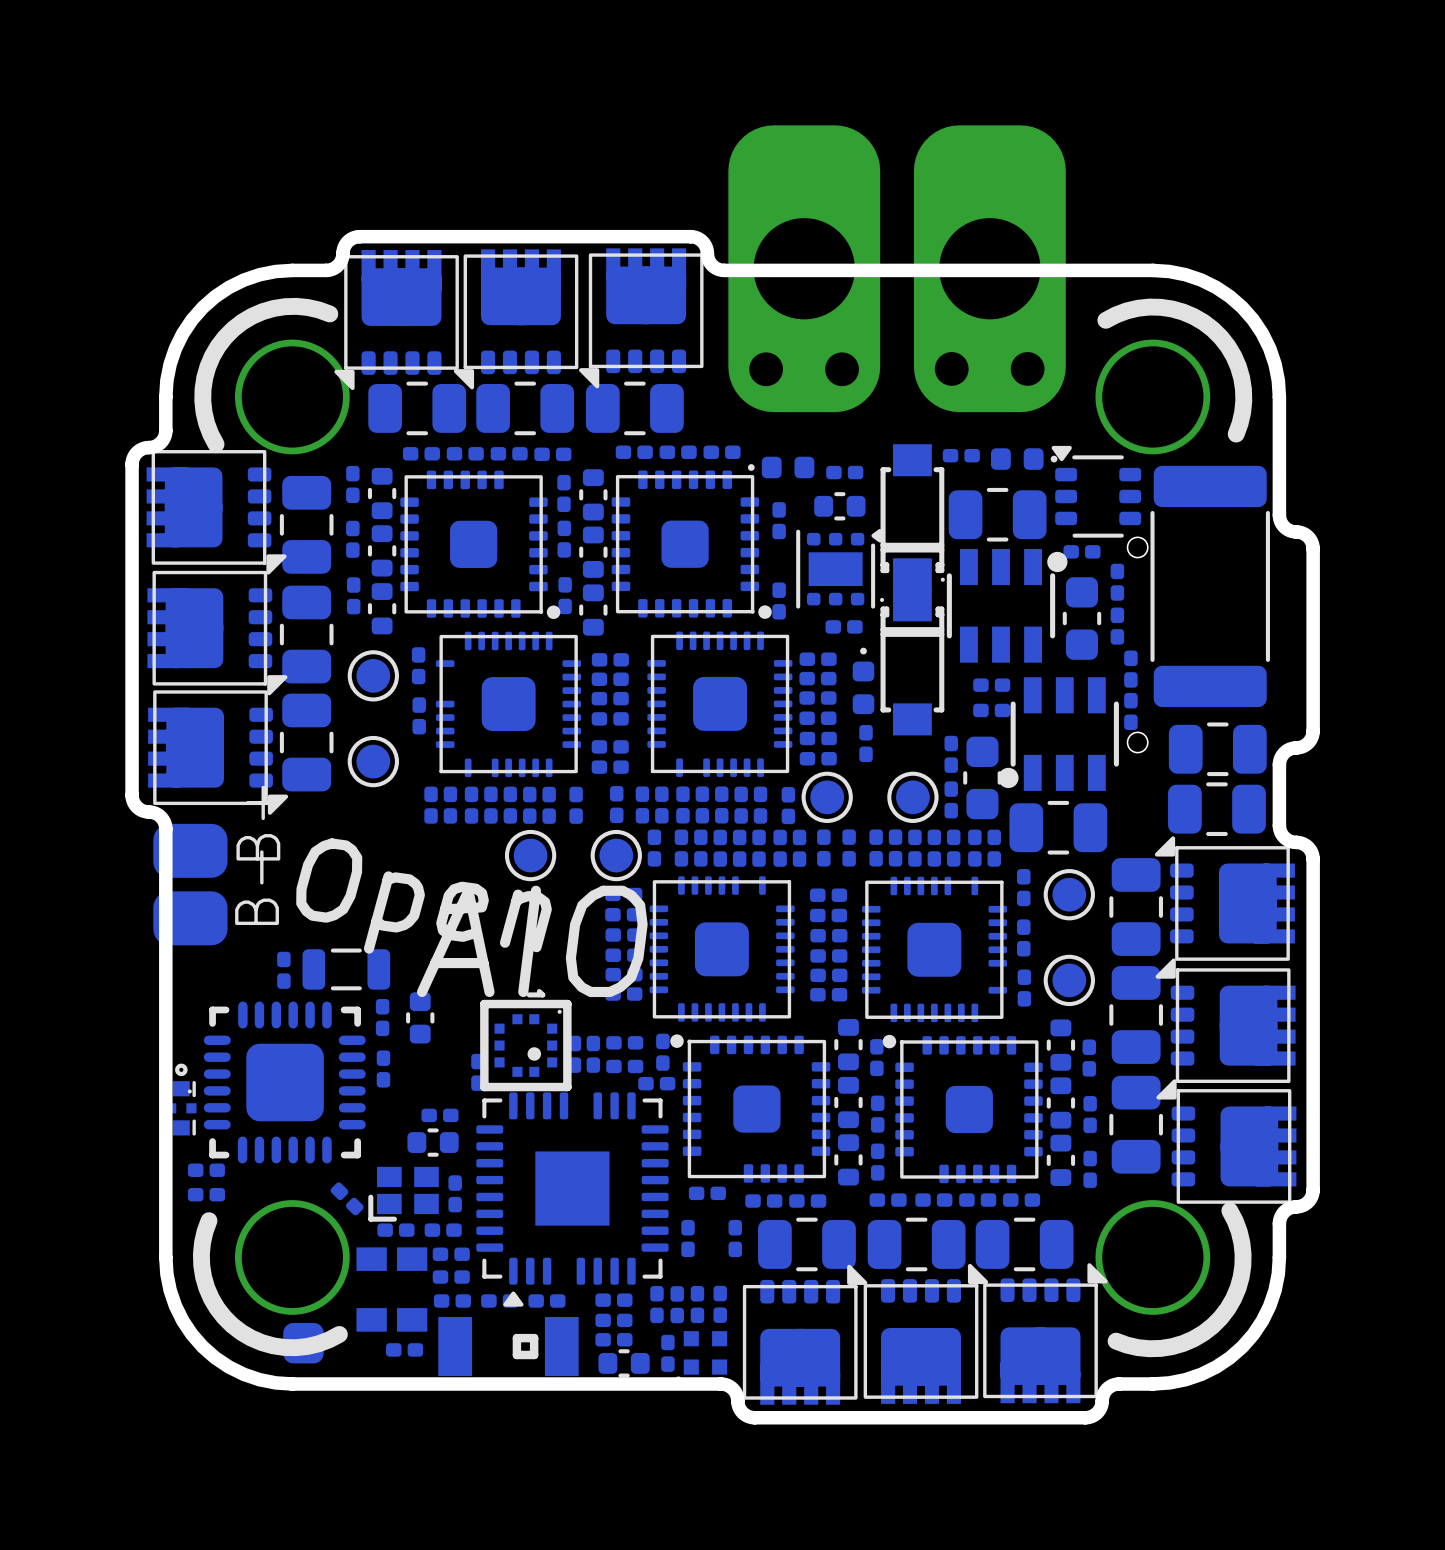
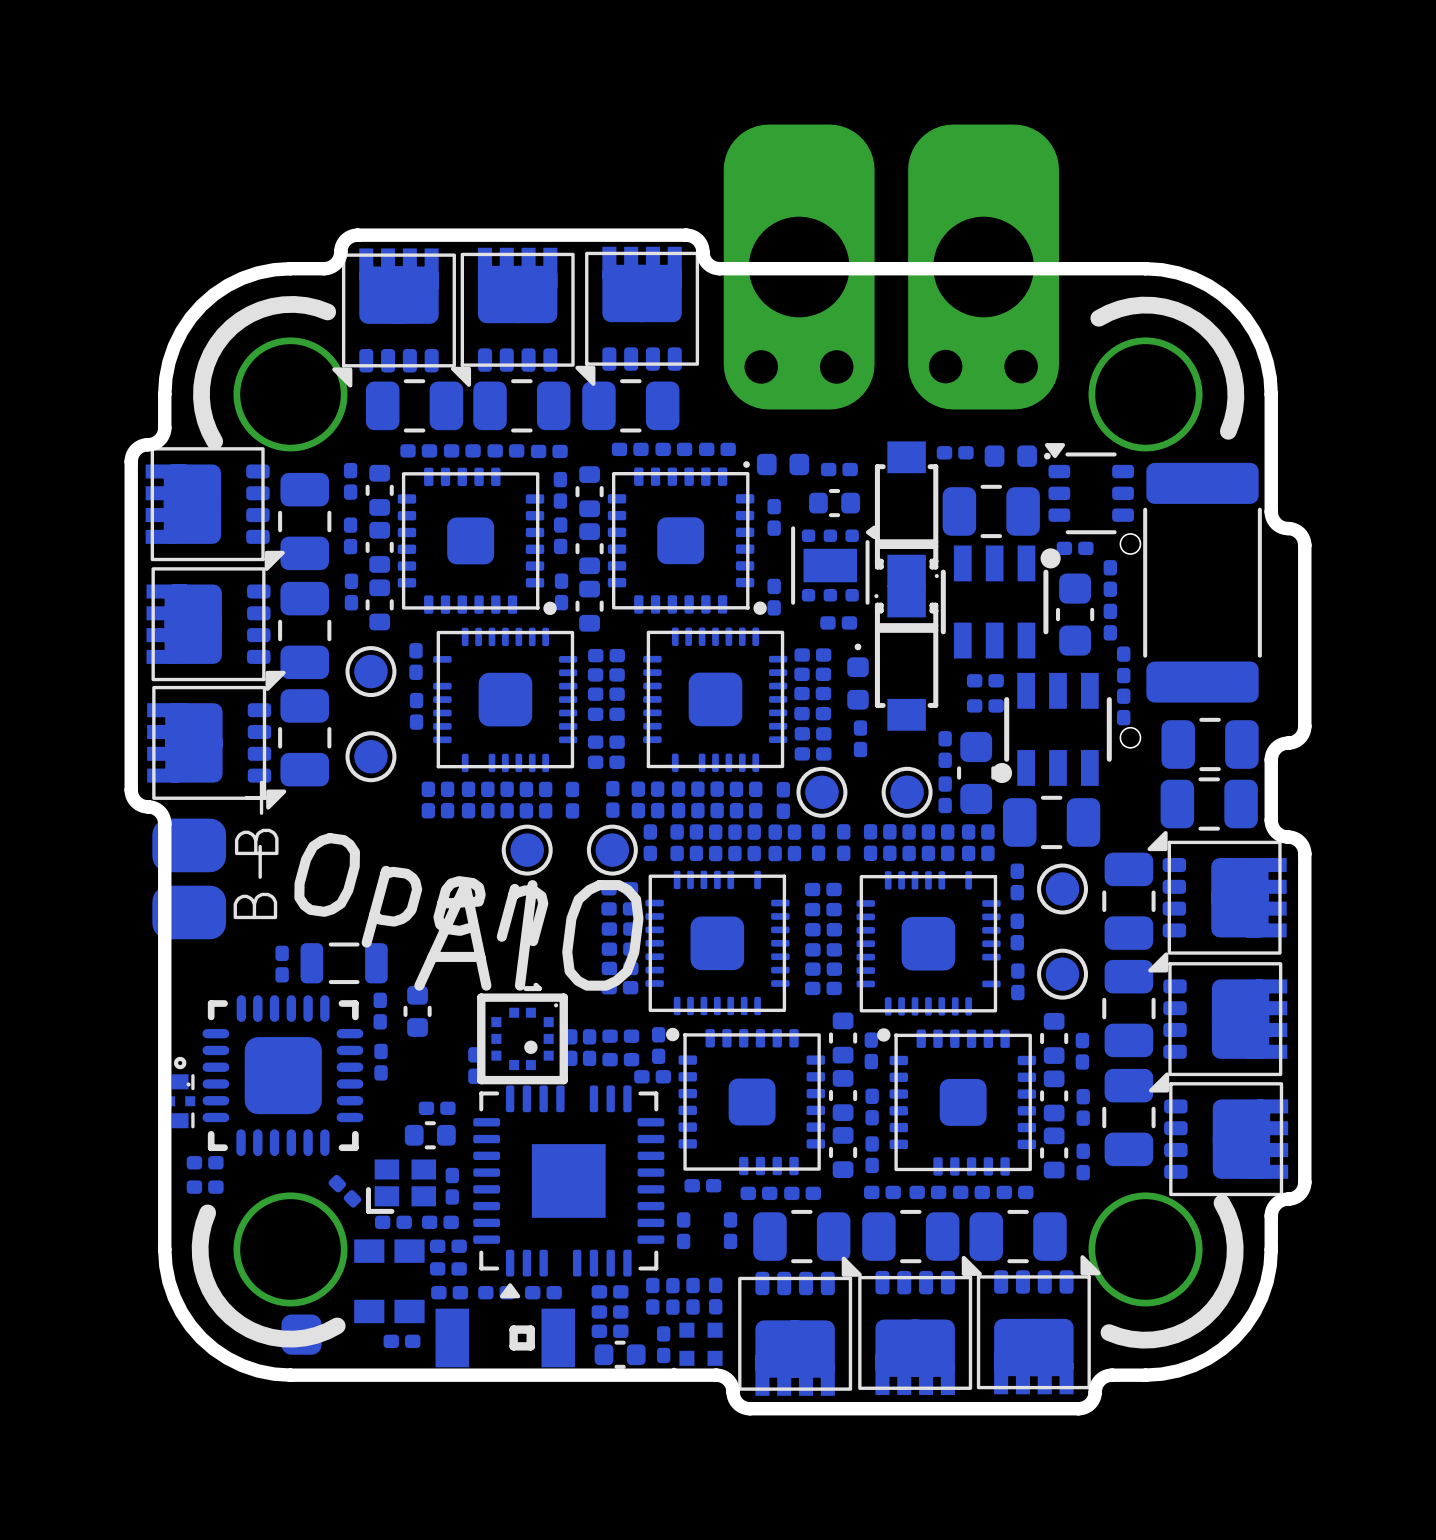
part footprint: [435, 631, 582, 778] -> [433, 627, 578, 773]

